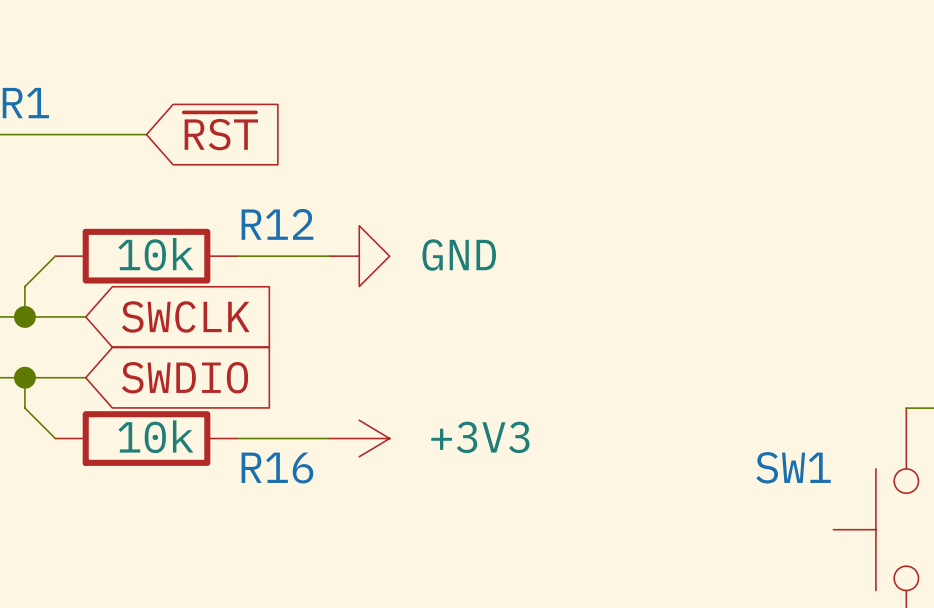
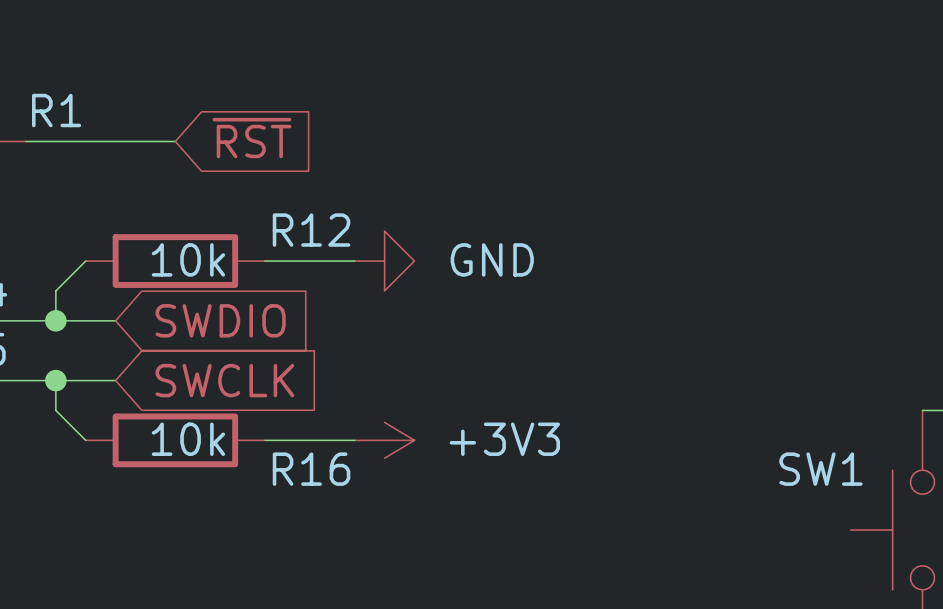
global label: SWCLK (185, 316) -> SWDIO (220, 320)
global label: SWDIO (185, 377) -> SWCLK (224, 380)

